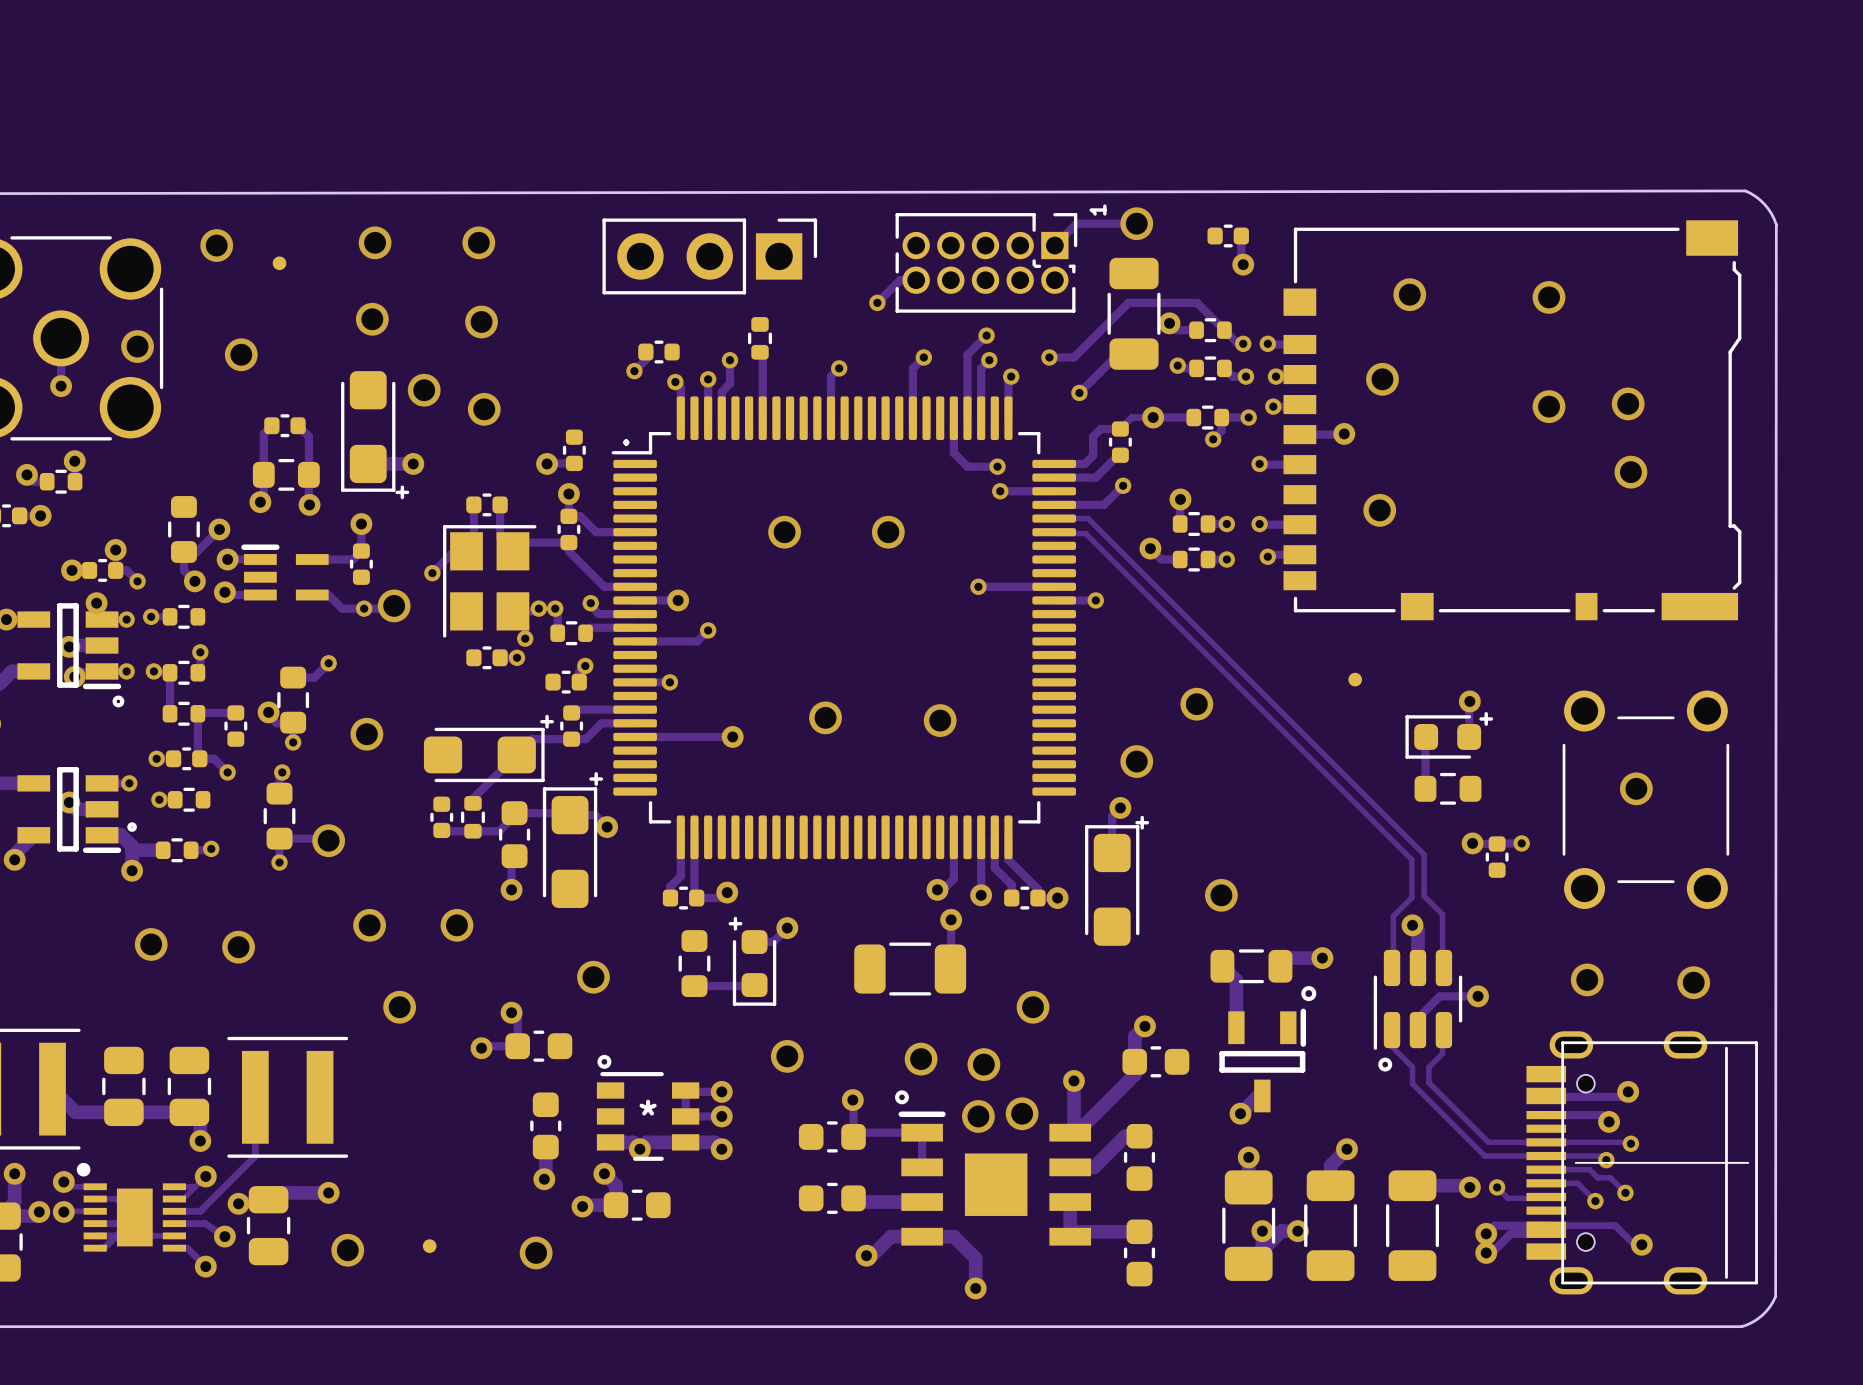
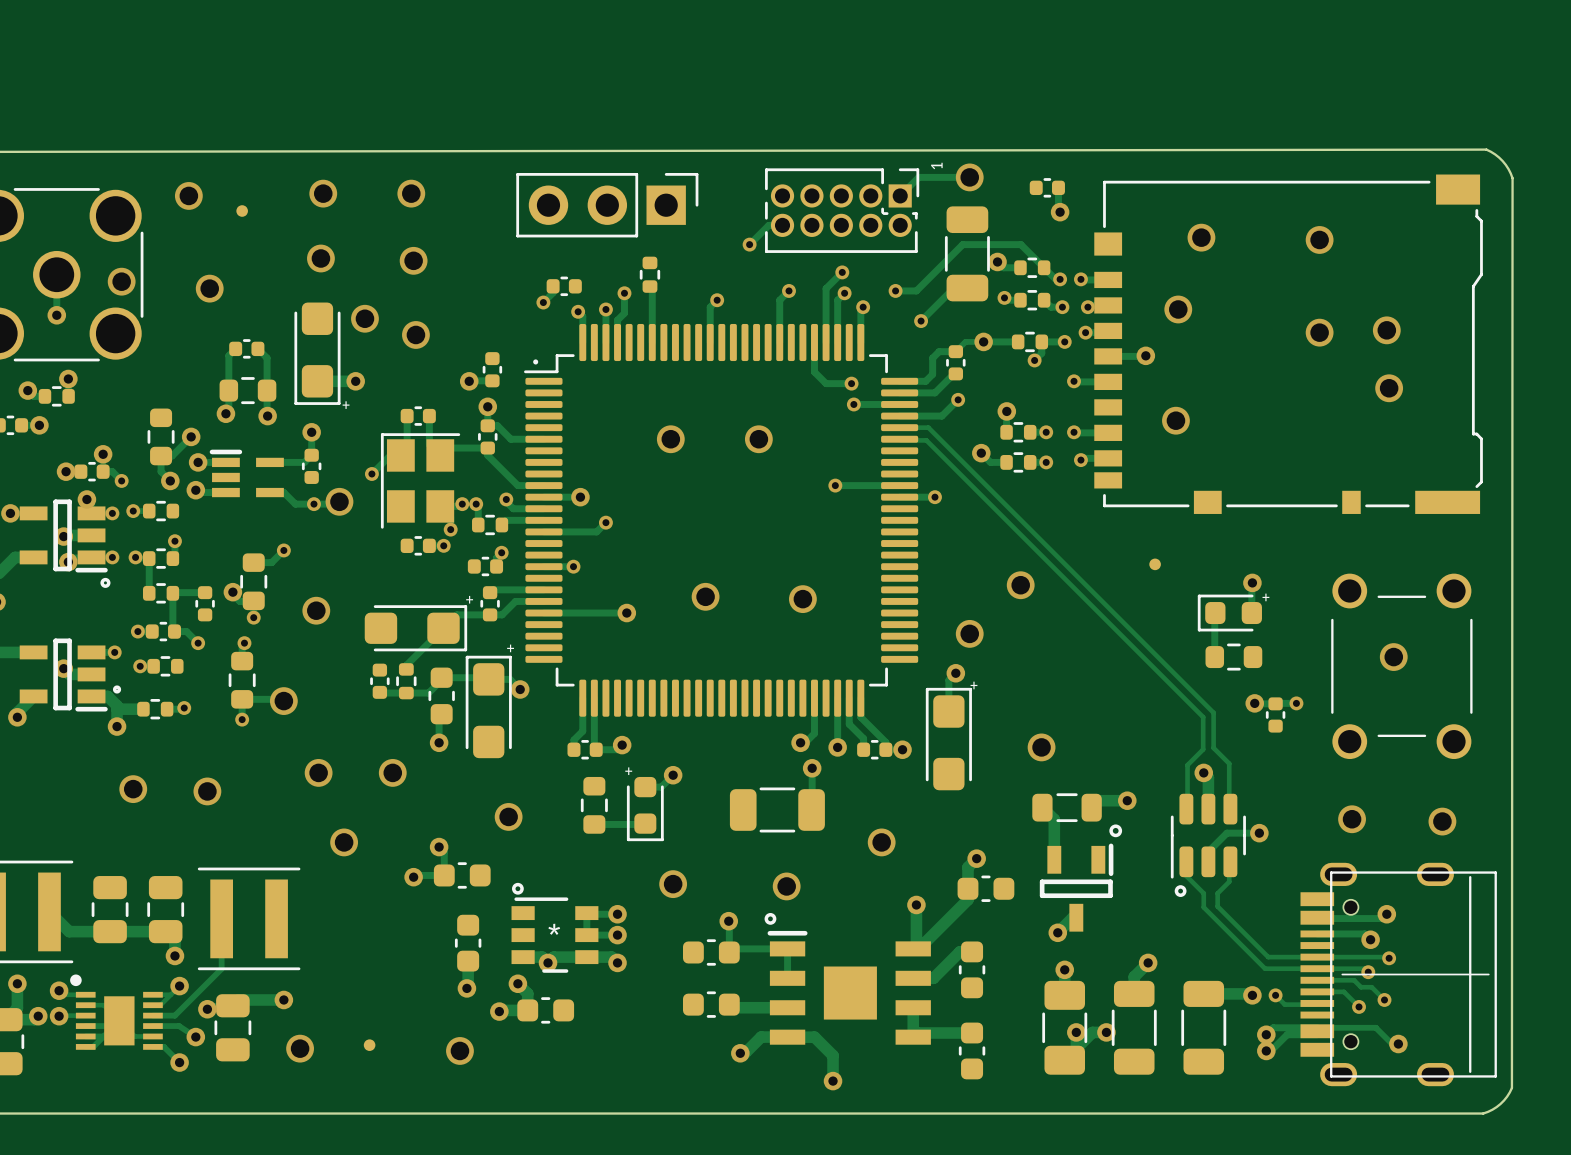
via: (983, 1064) -> none
via: (1022, 1113) -> none
via: (978, 1116) -> none

